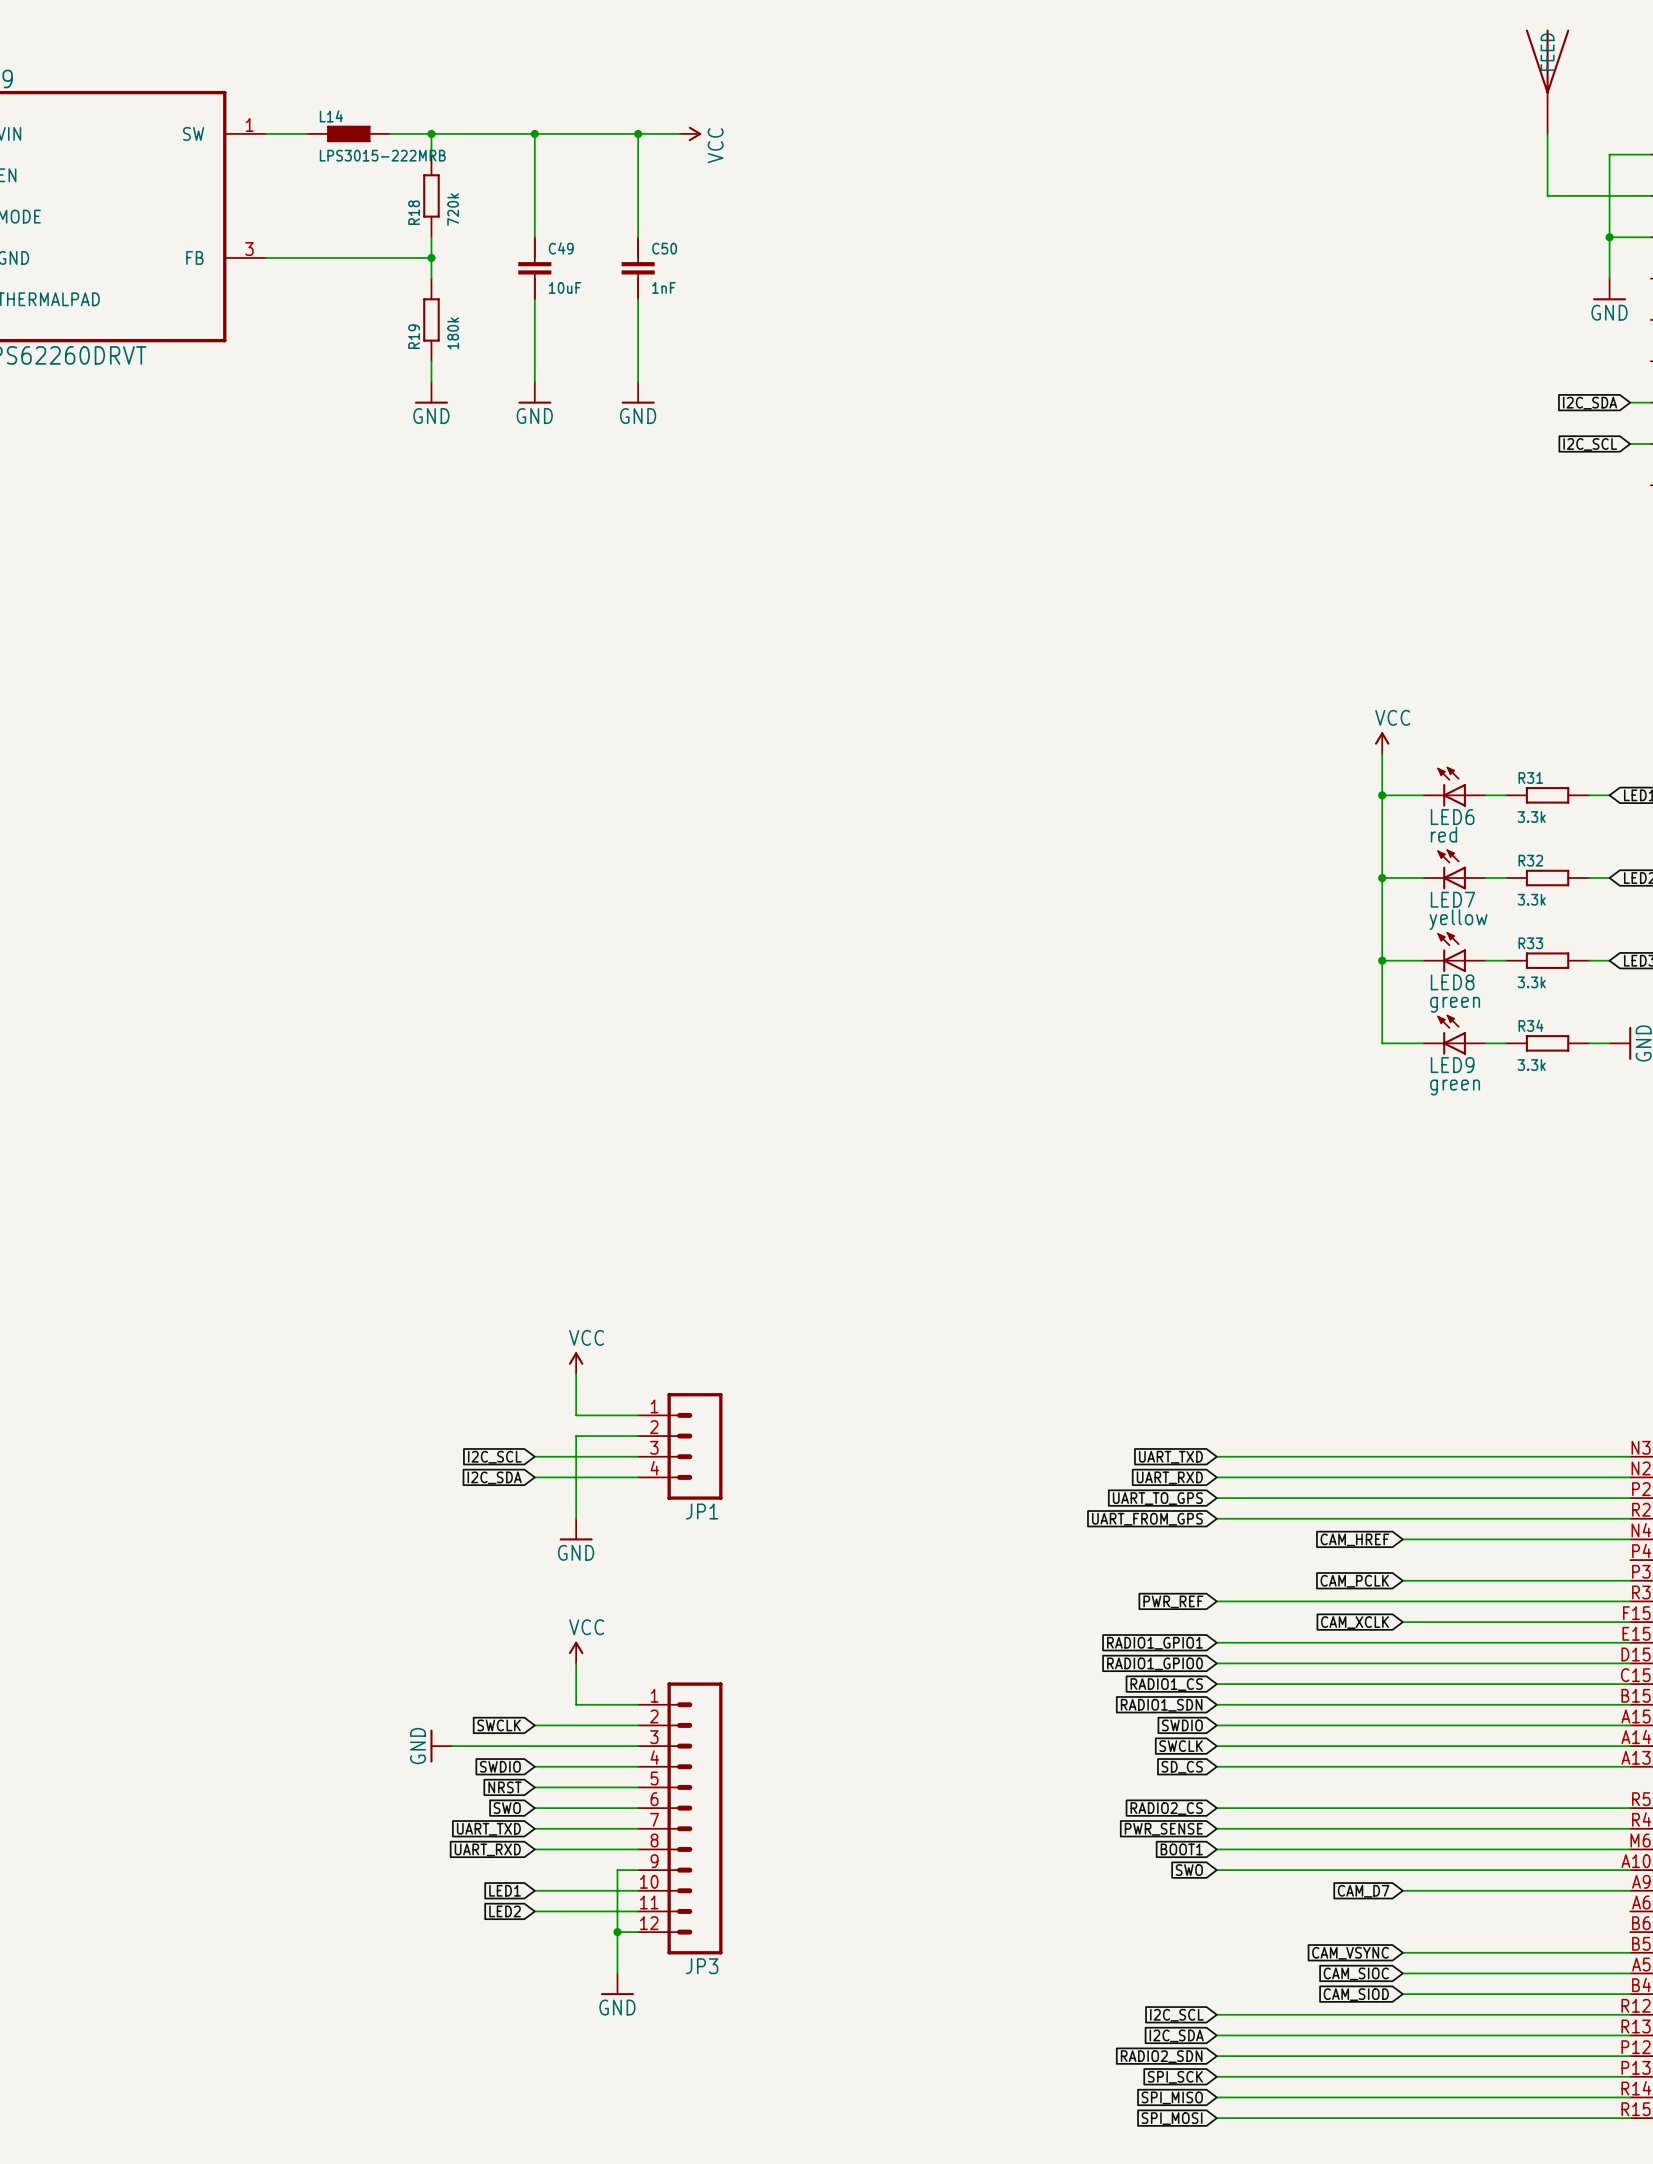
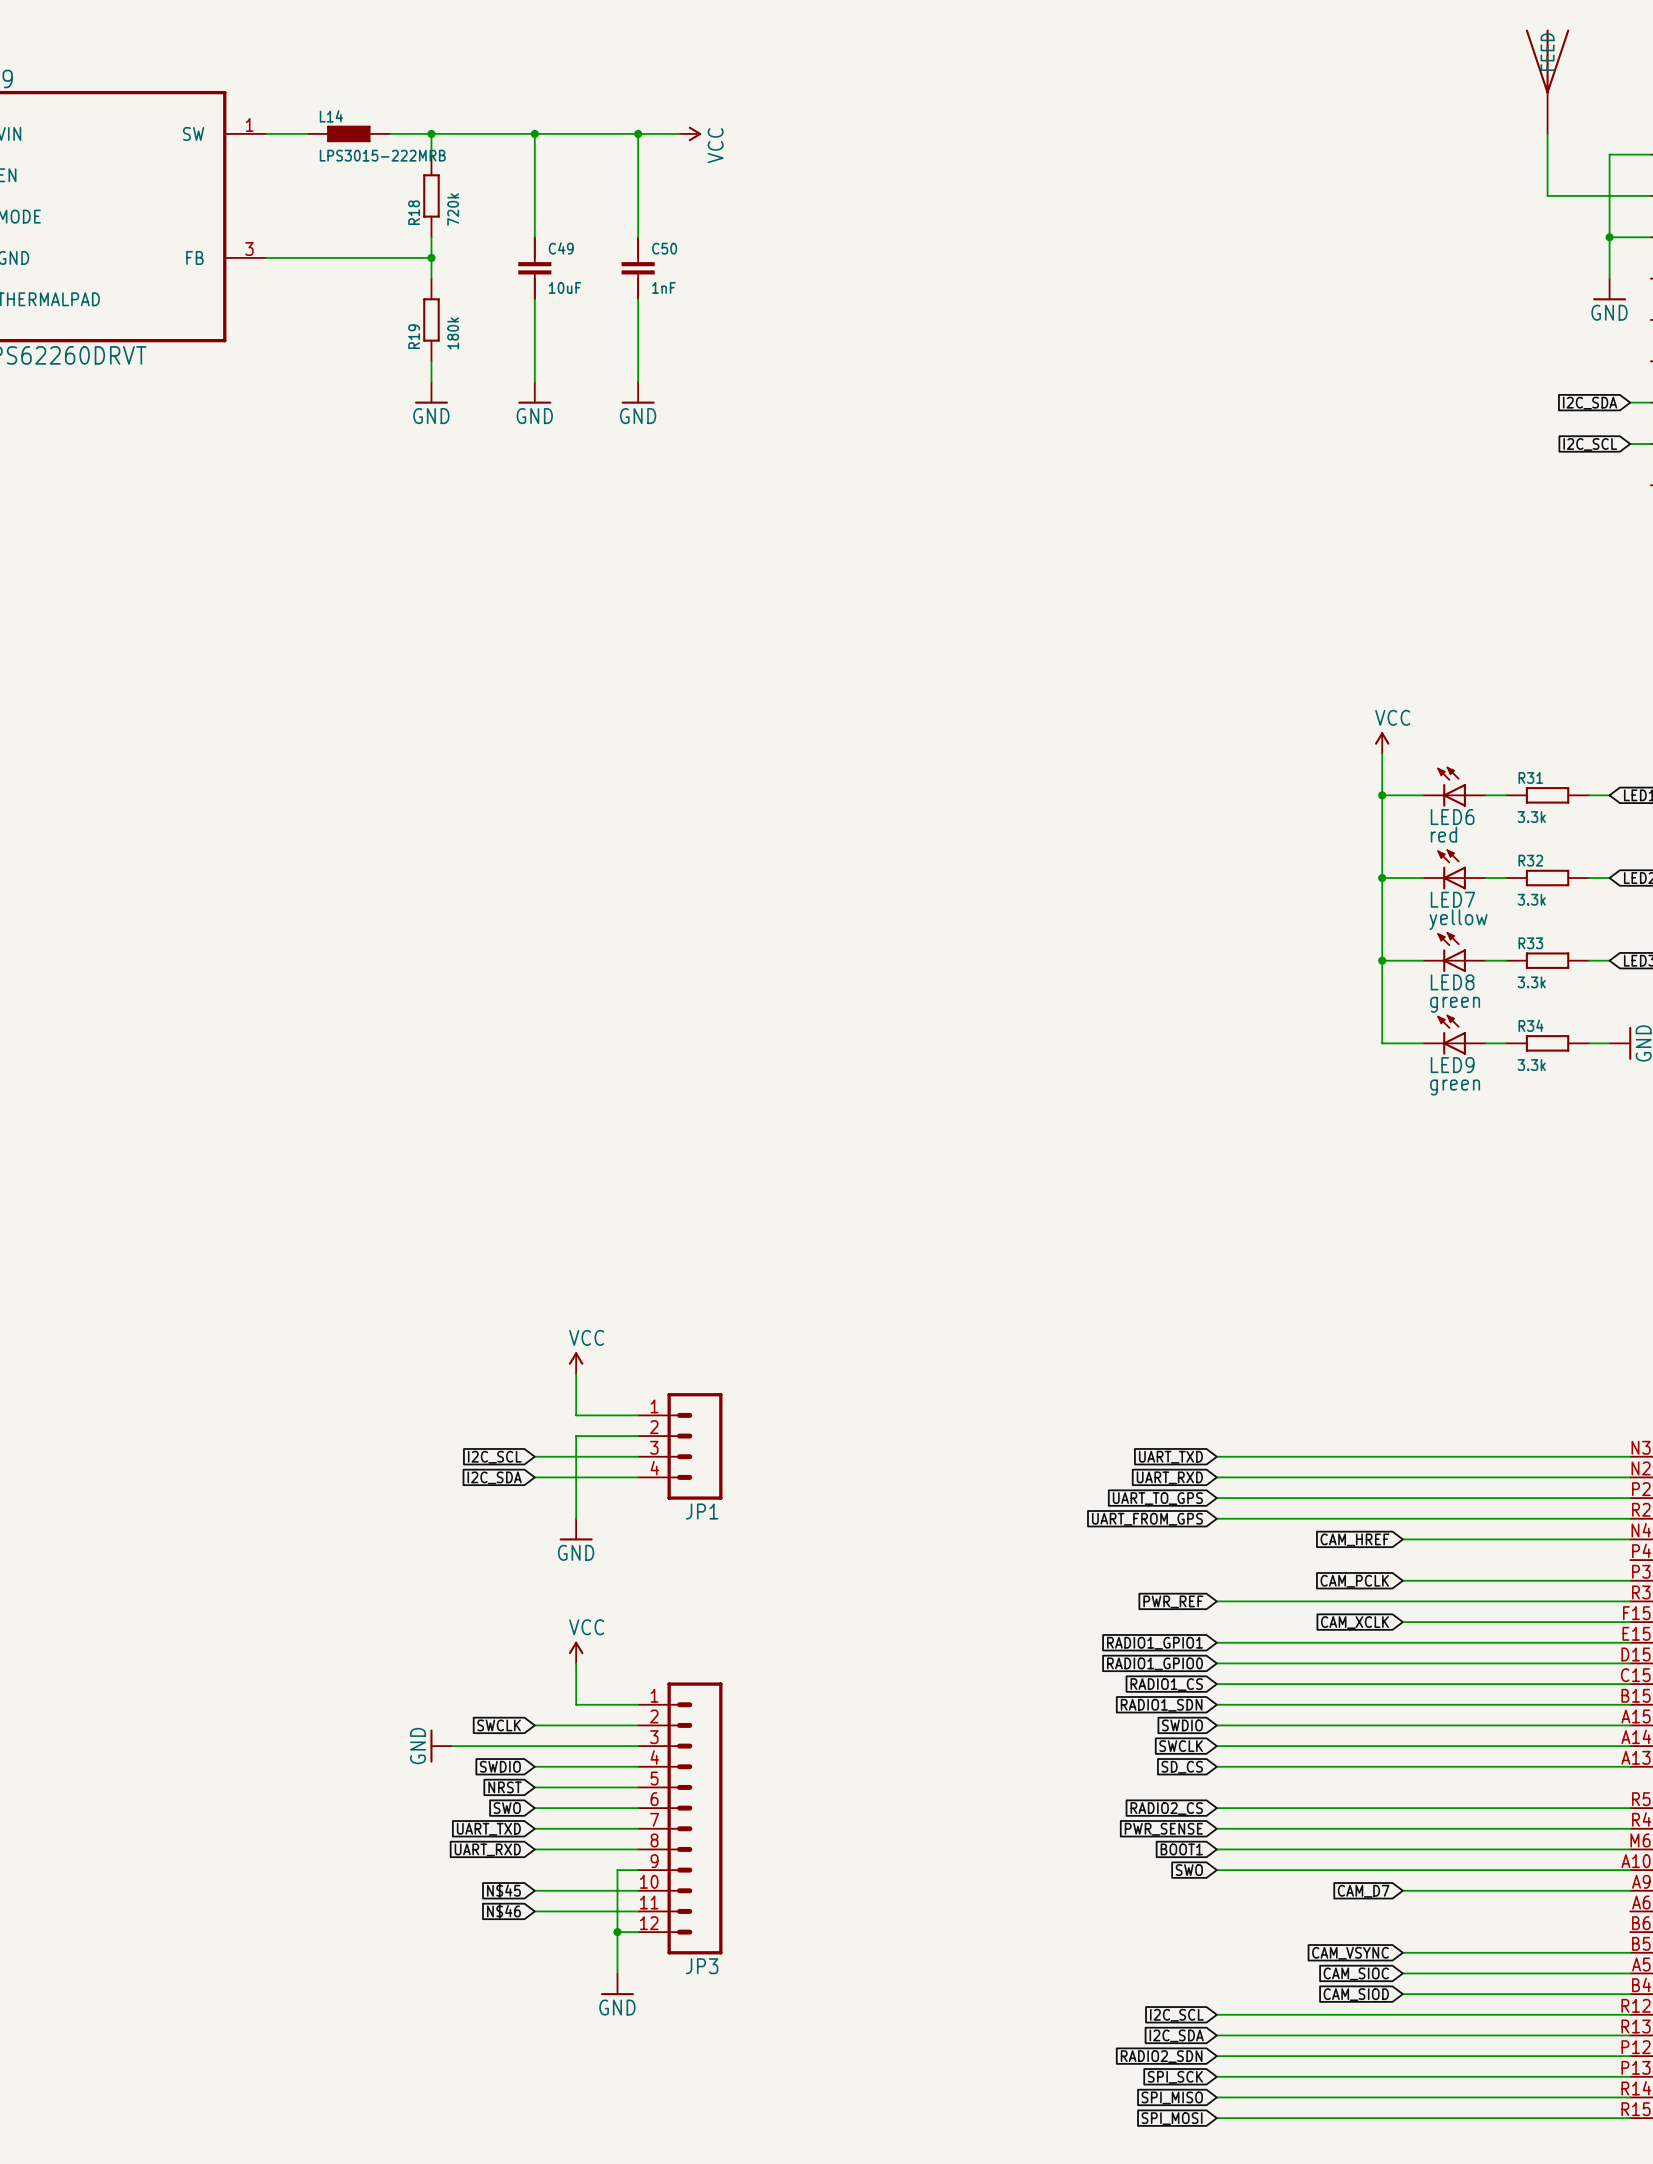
global label: LED1 (505, 1890) -> N$45 (503, 1890)
global label: LED2 (505, 1911) -> N$46 (503, 1911)

